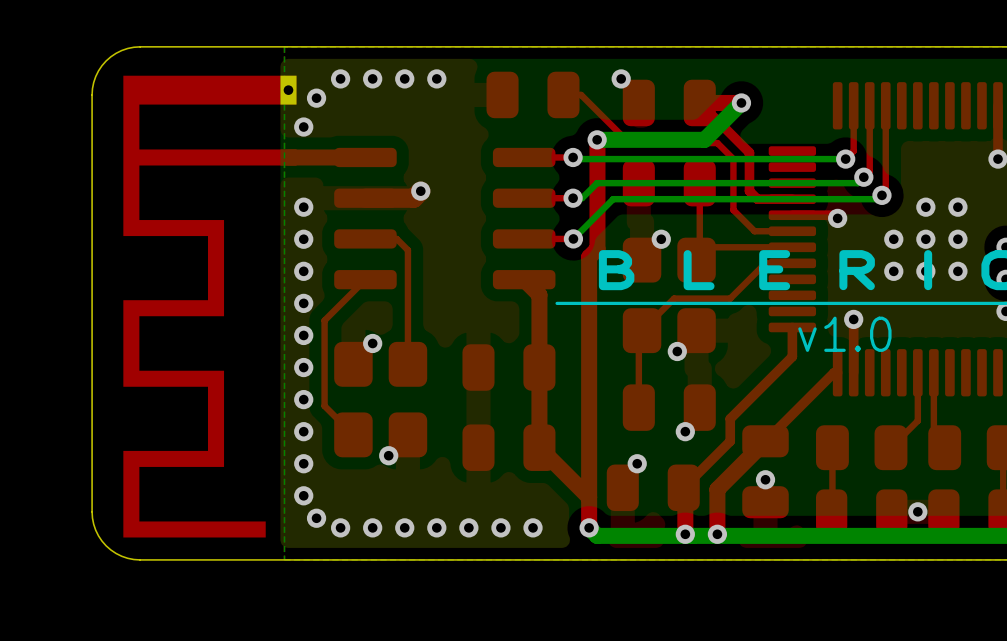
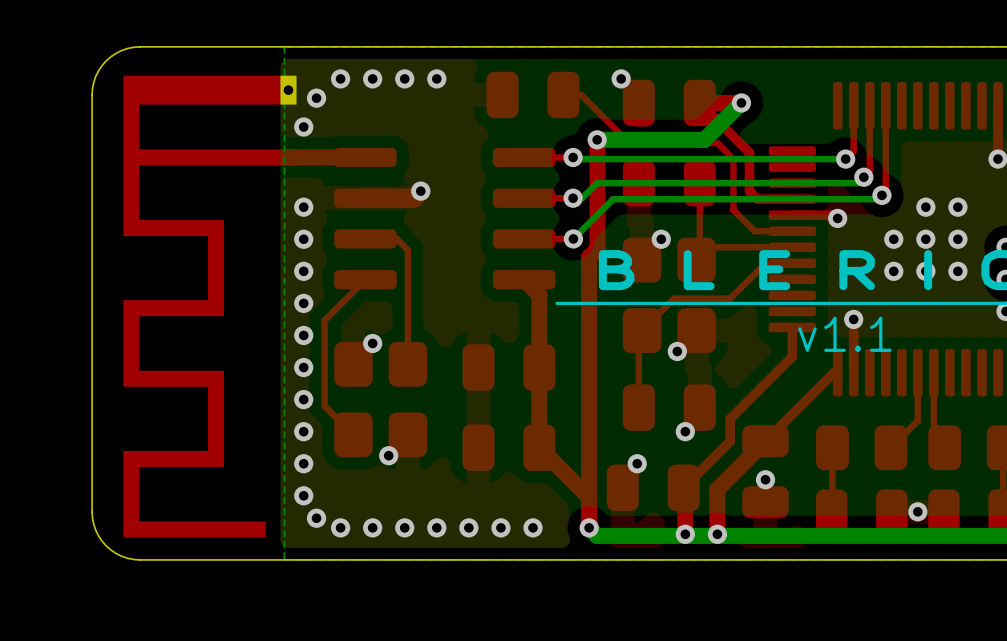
text: v1.0 (844, 334) -> v1.1 (844, 334)

